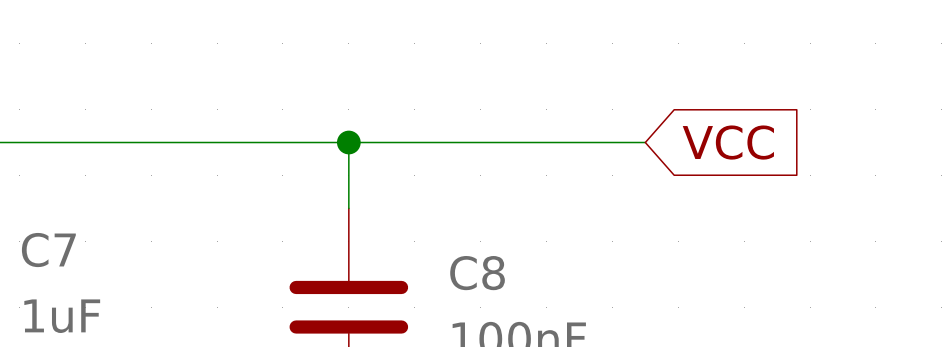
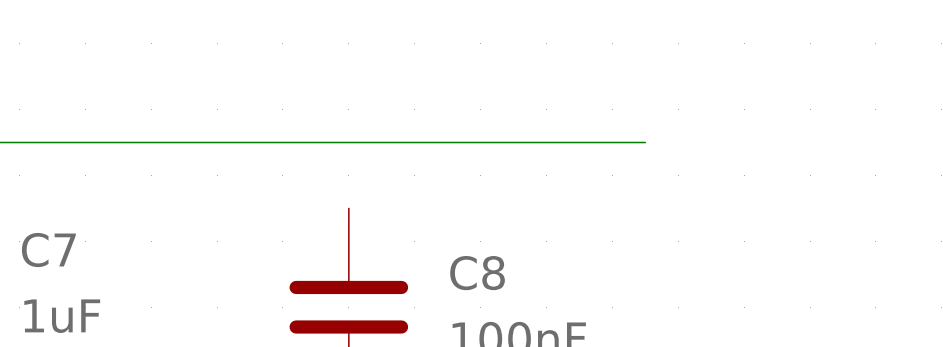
wire: (348, 142) (348, 208) -> none
junction: (348, 142) -> none
global label: VCC (728, 142) -> none

